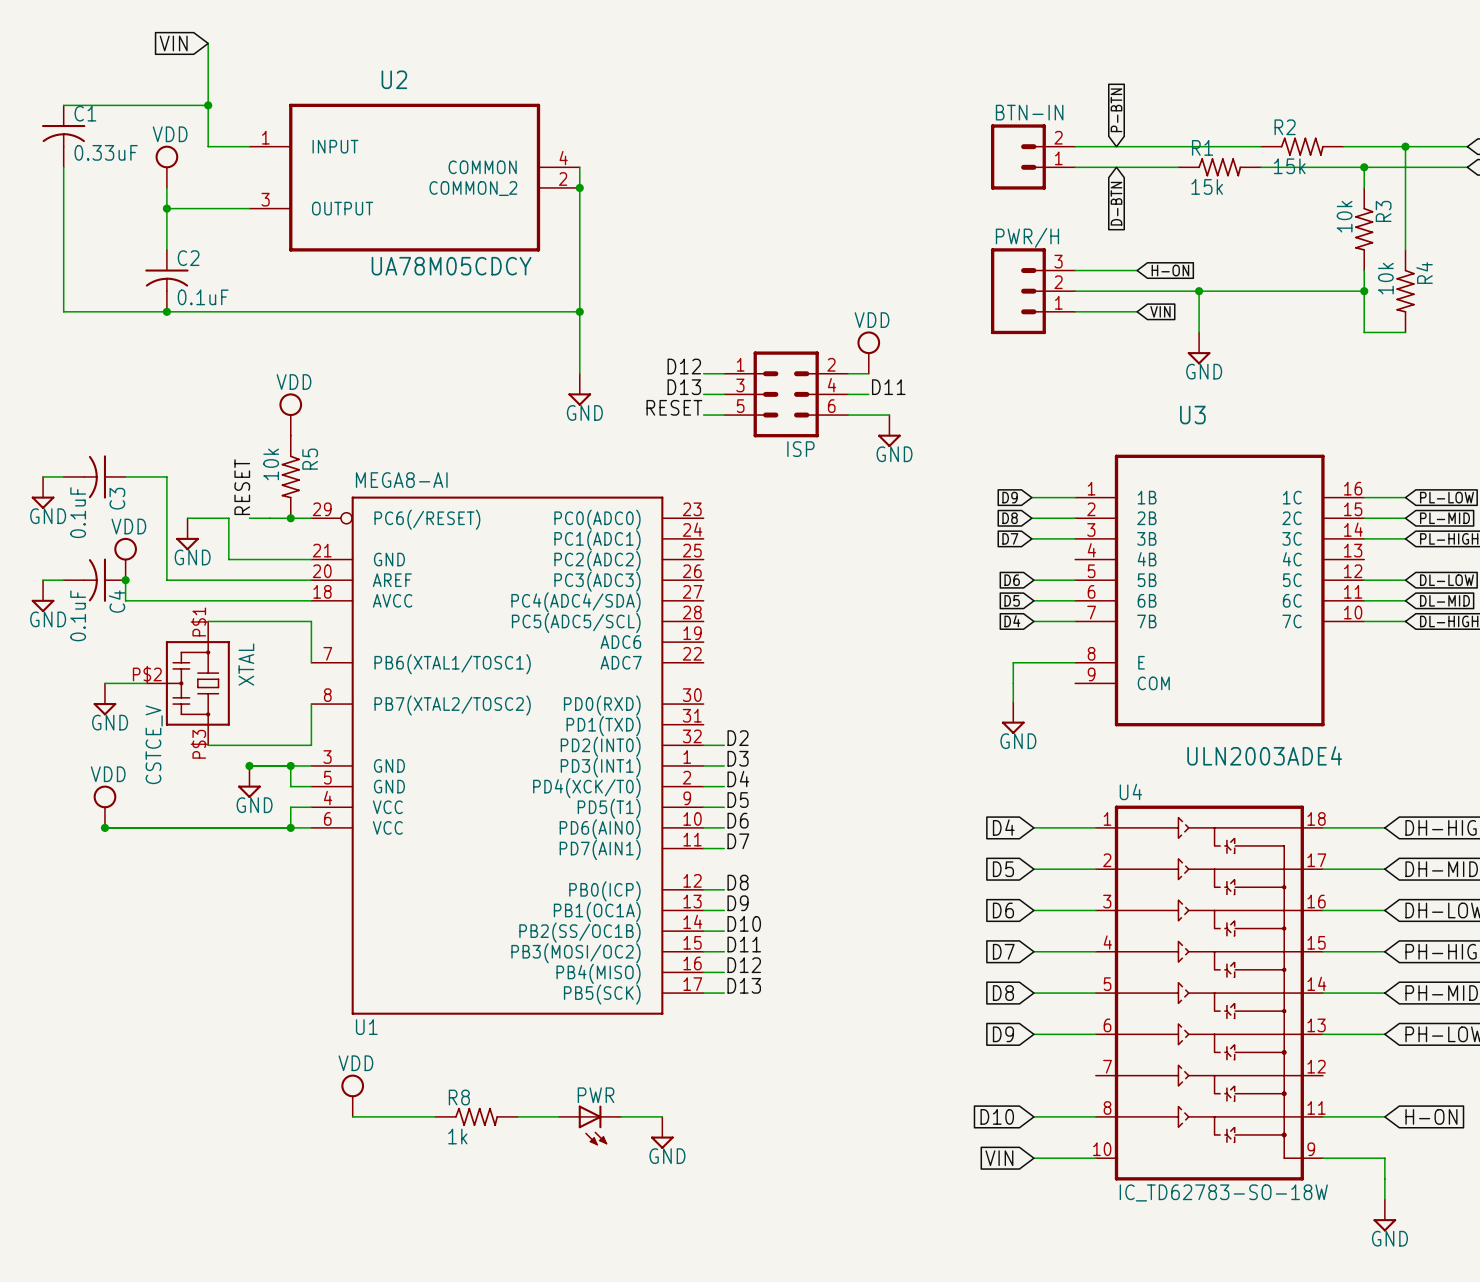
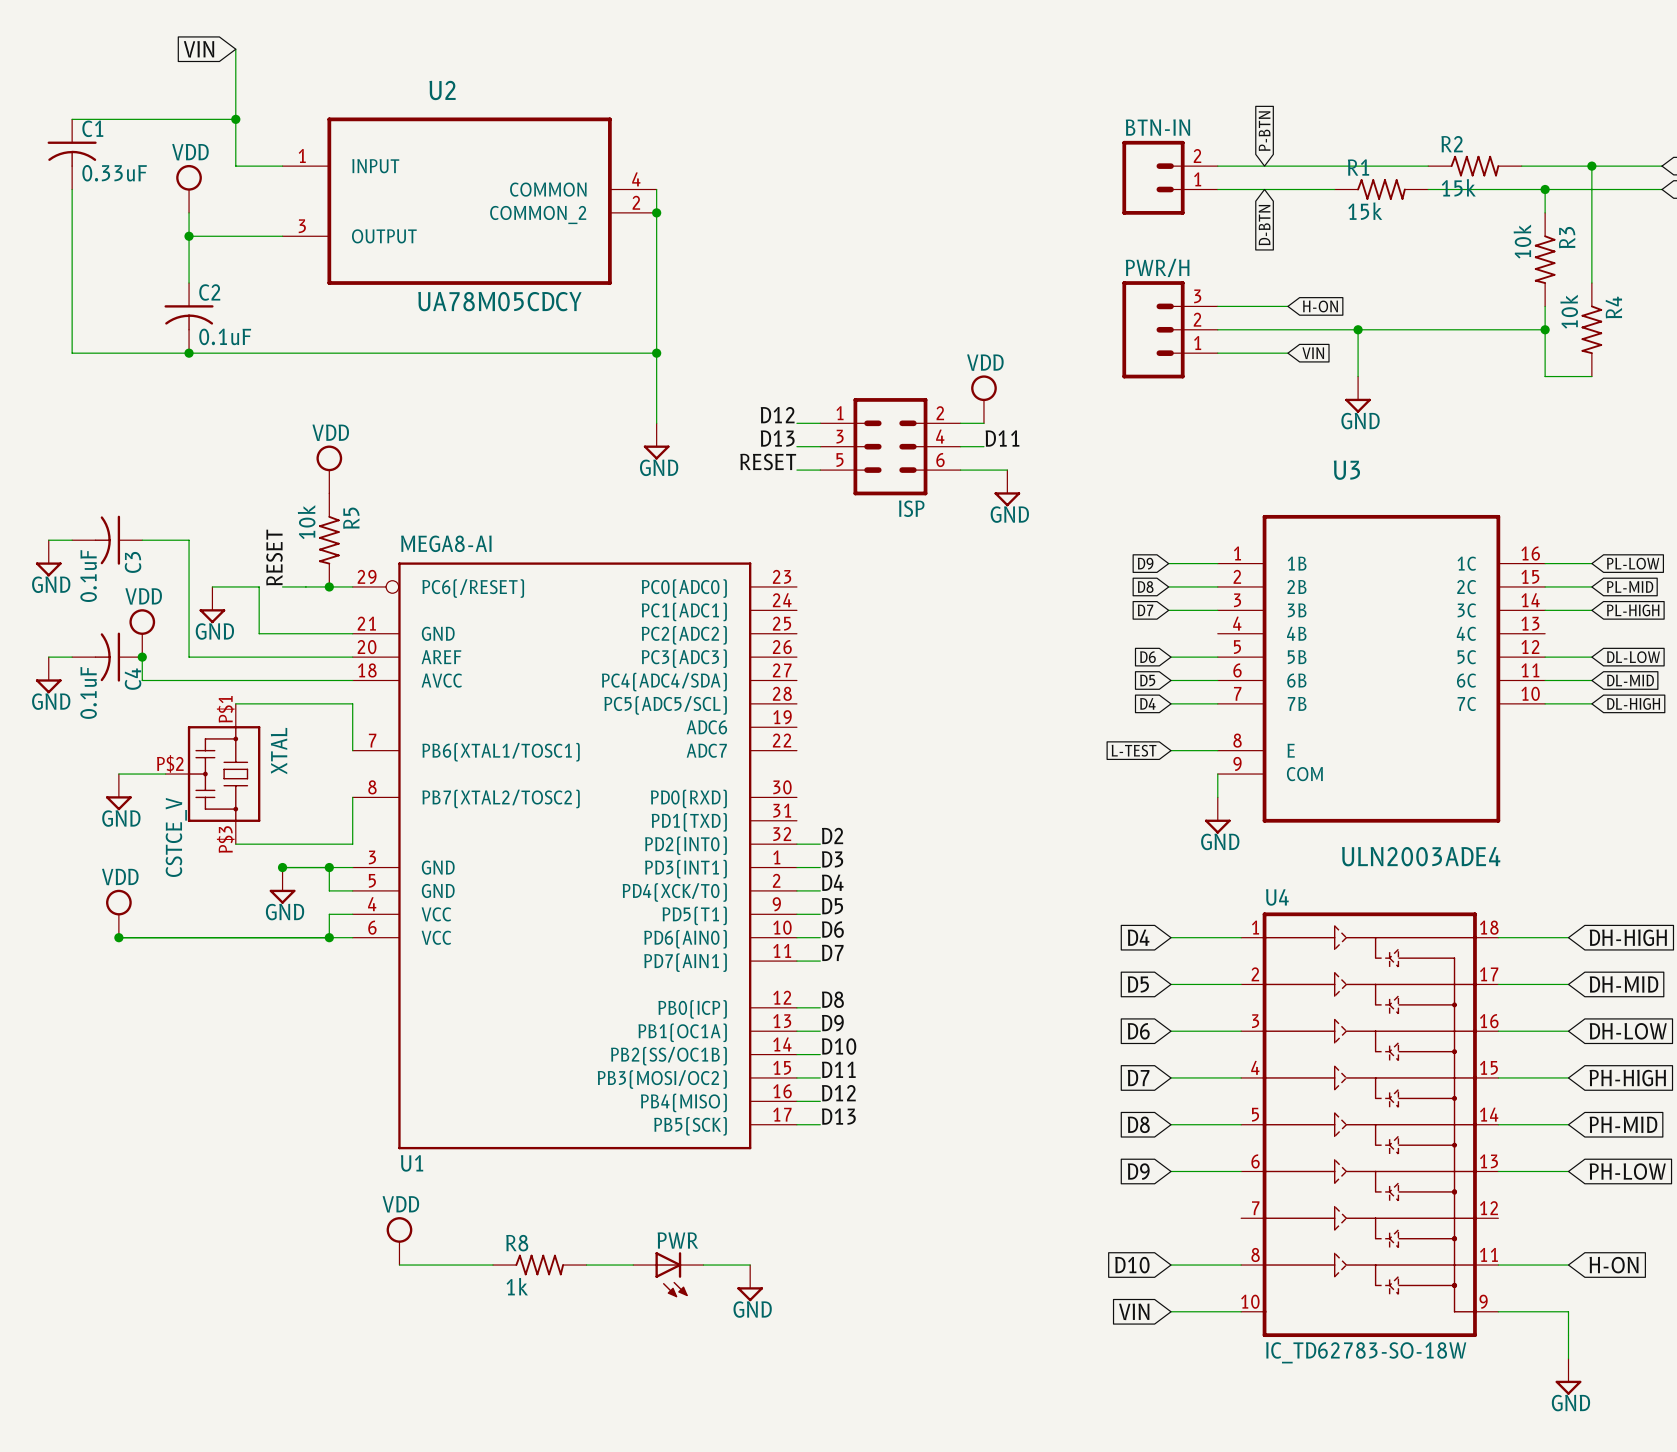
global label: none -> L-TEST (1134, 750)
wire: (1033, 662) (1013, 662) (1013, 701) -> none
wire: none -> (1217, 774) (1217, 797)
power symbol position: GND (1013, 717) -> GND (1217, 815)

